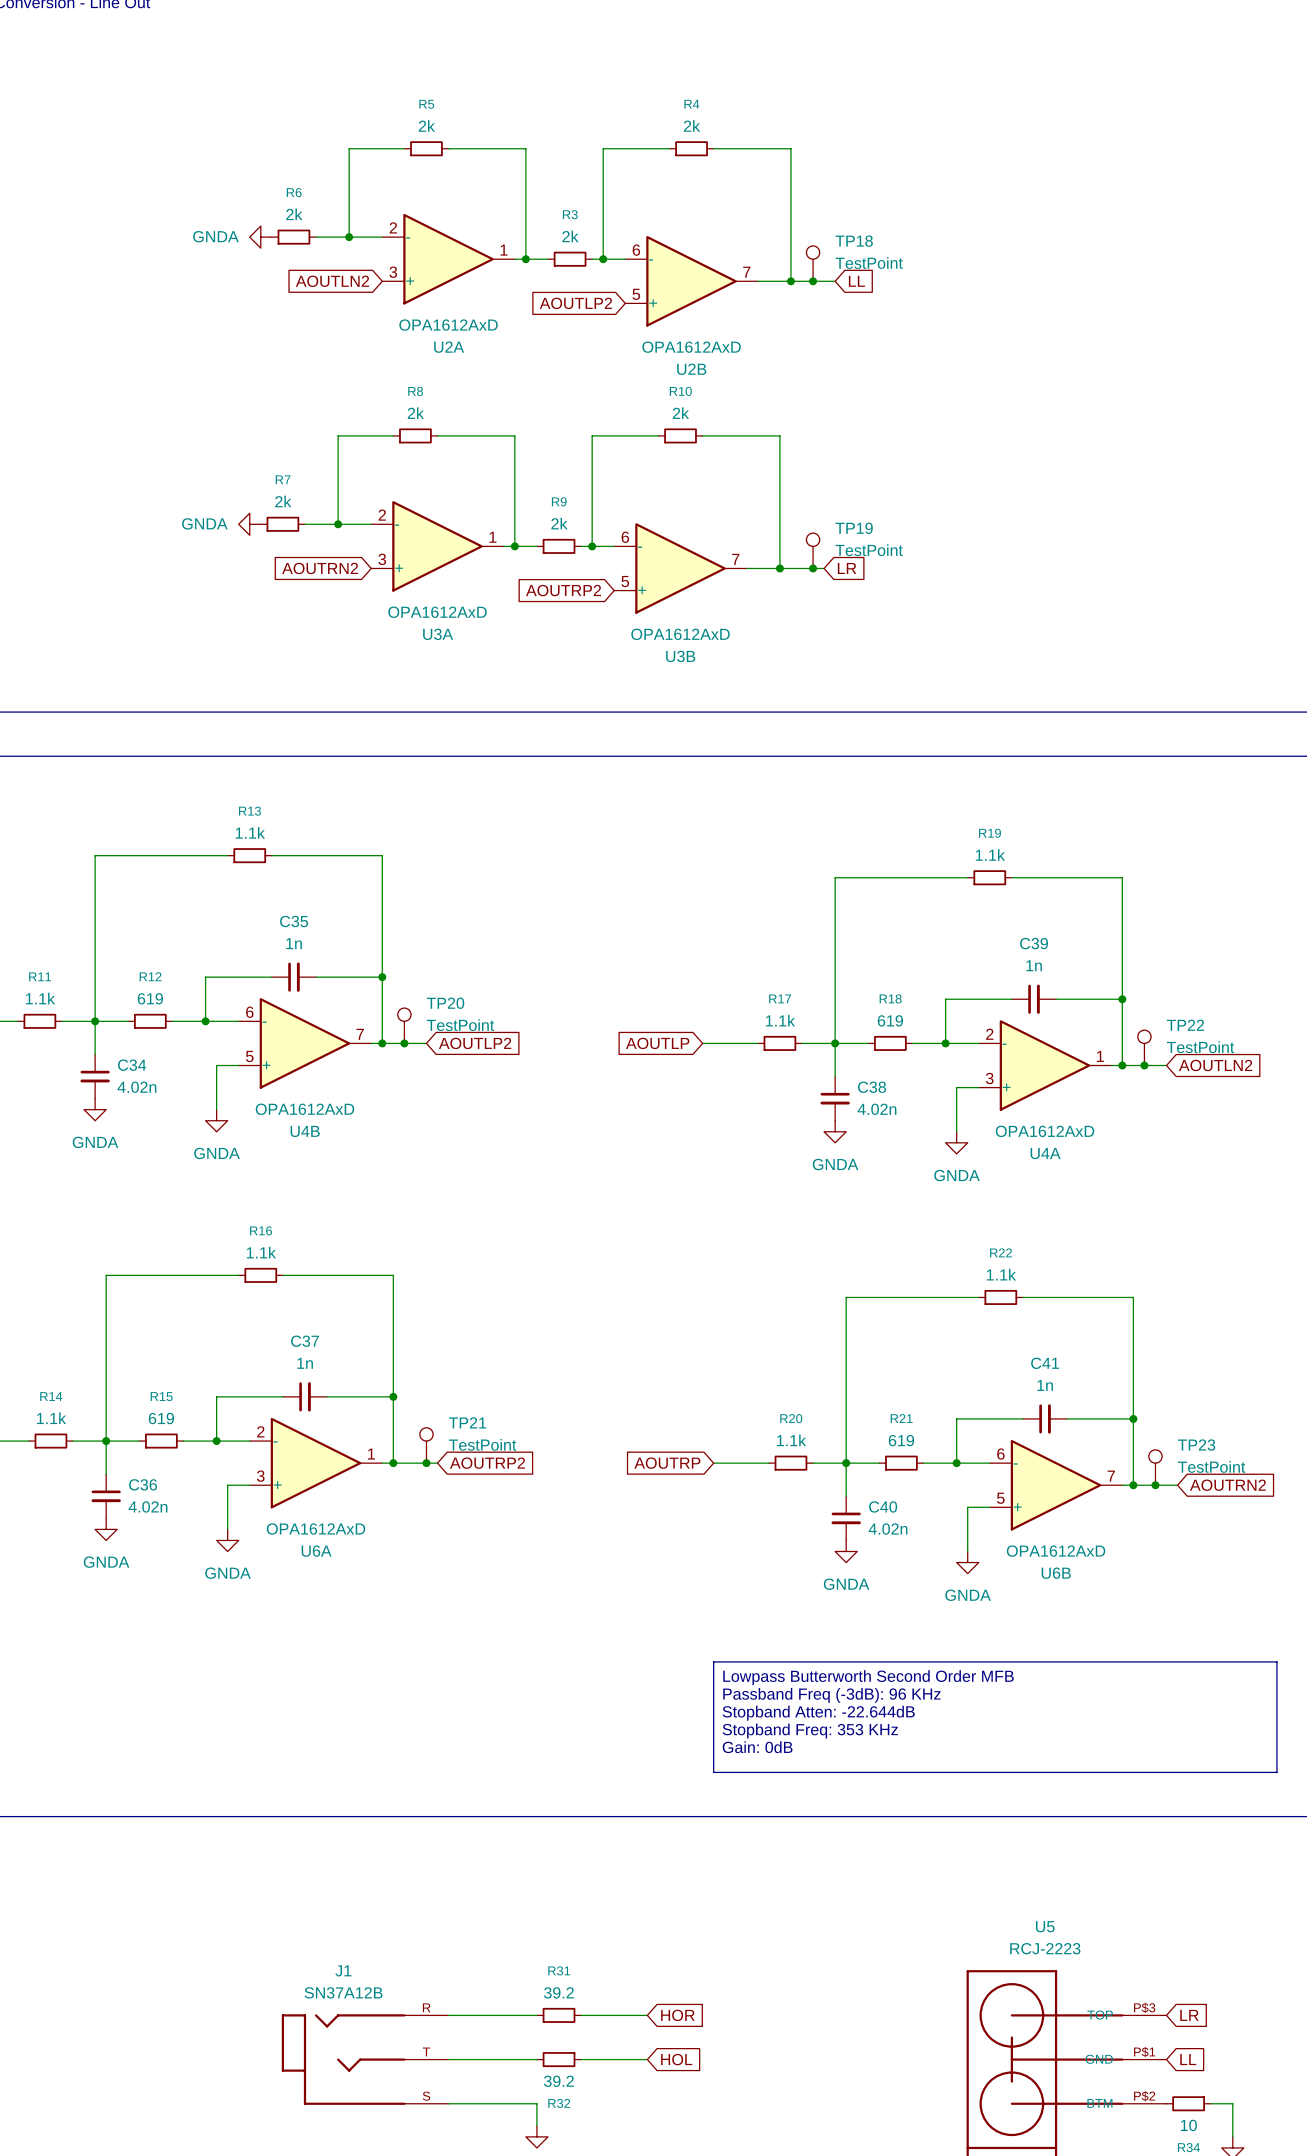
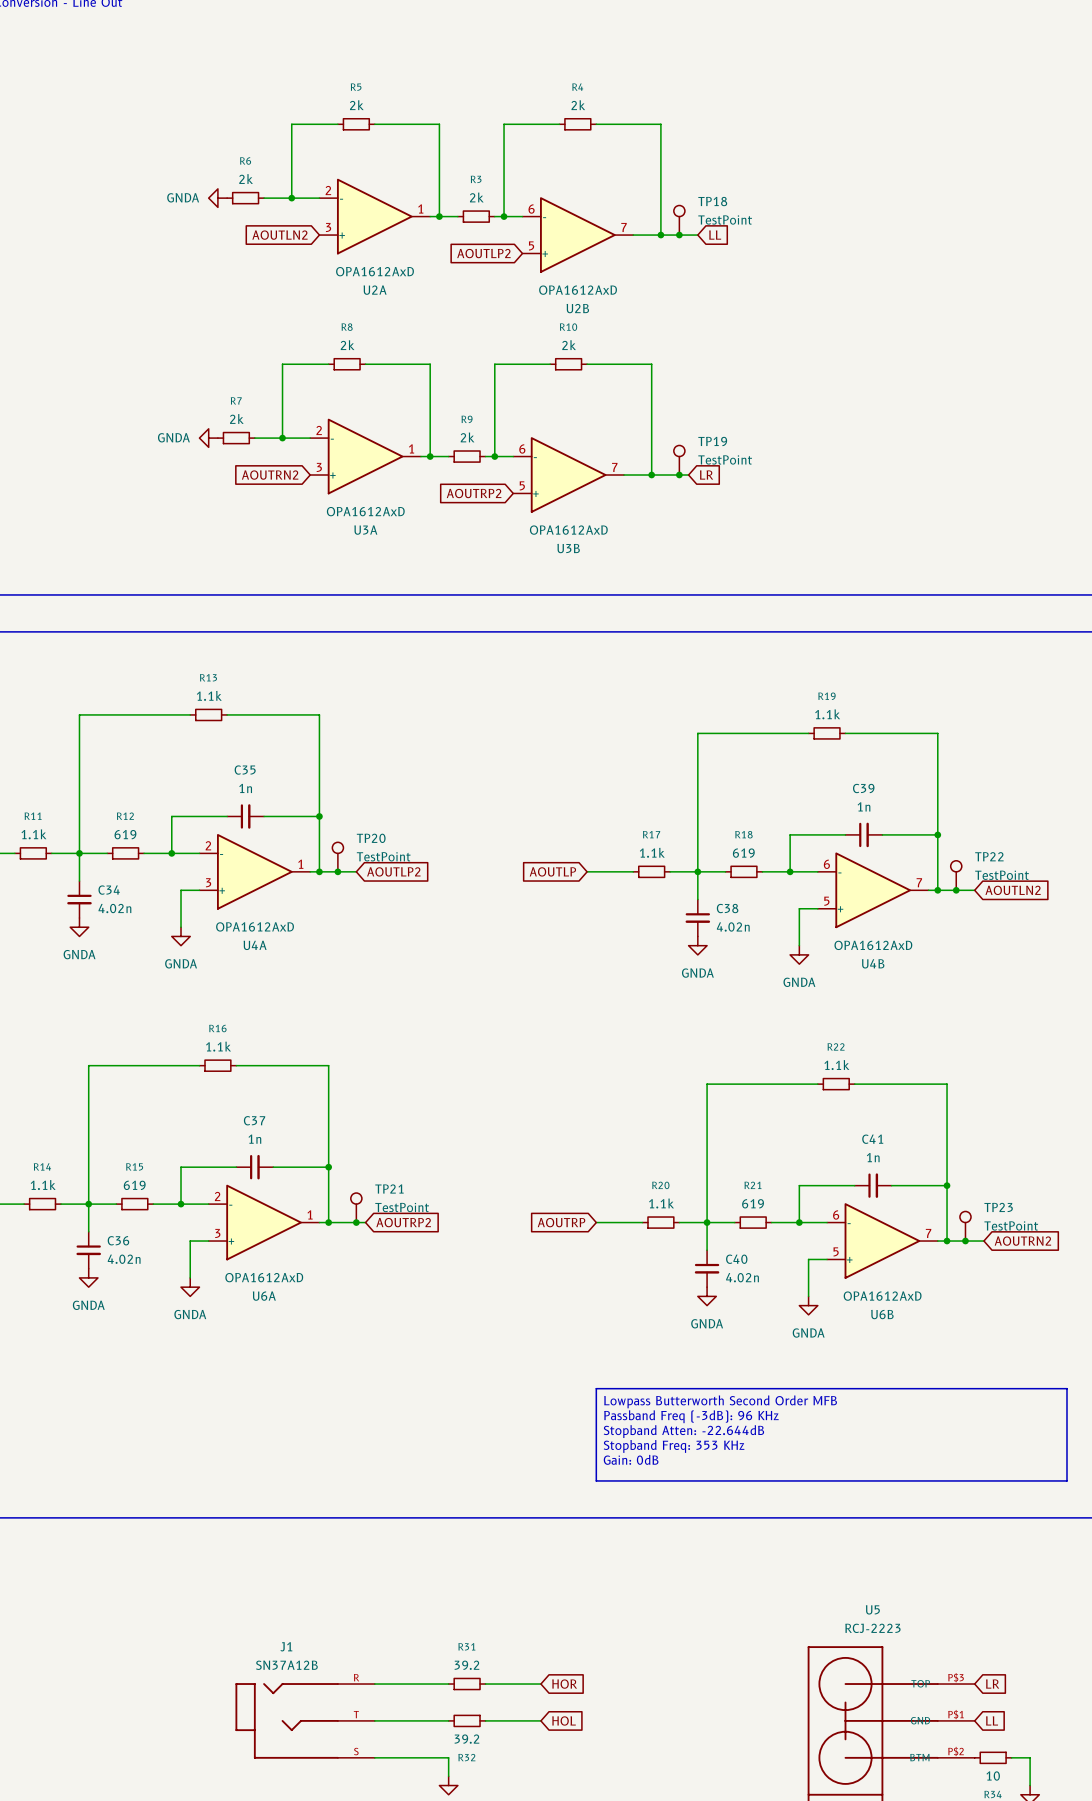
U4B position: (304, 1043) -> (873, 890)
U4A position: (1045, 1065) -> (254, 871)

